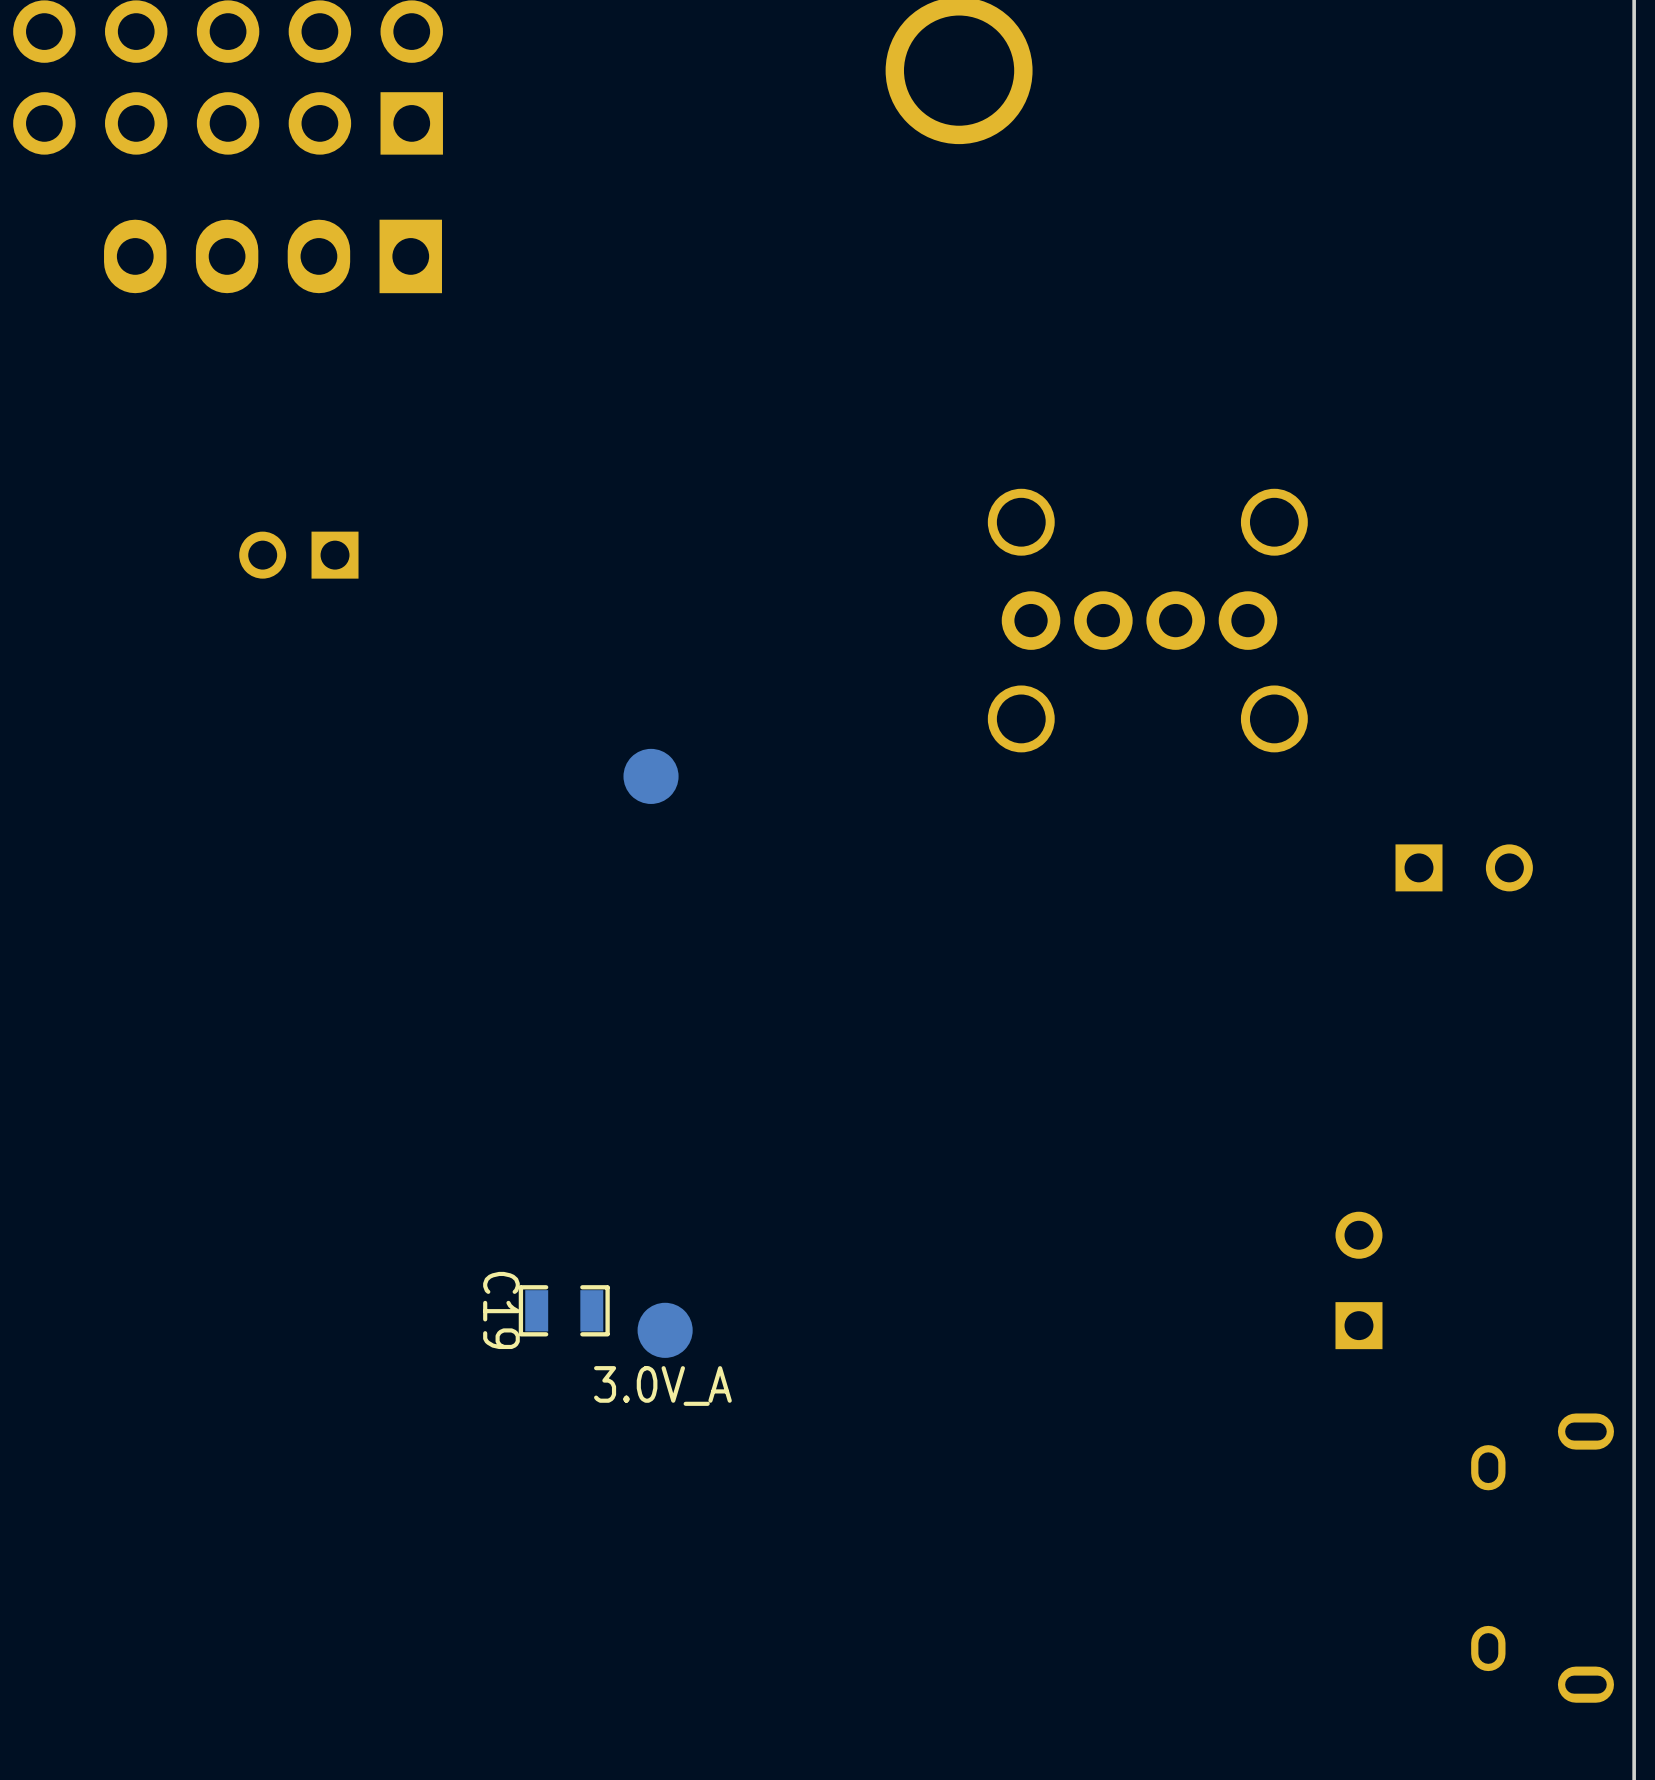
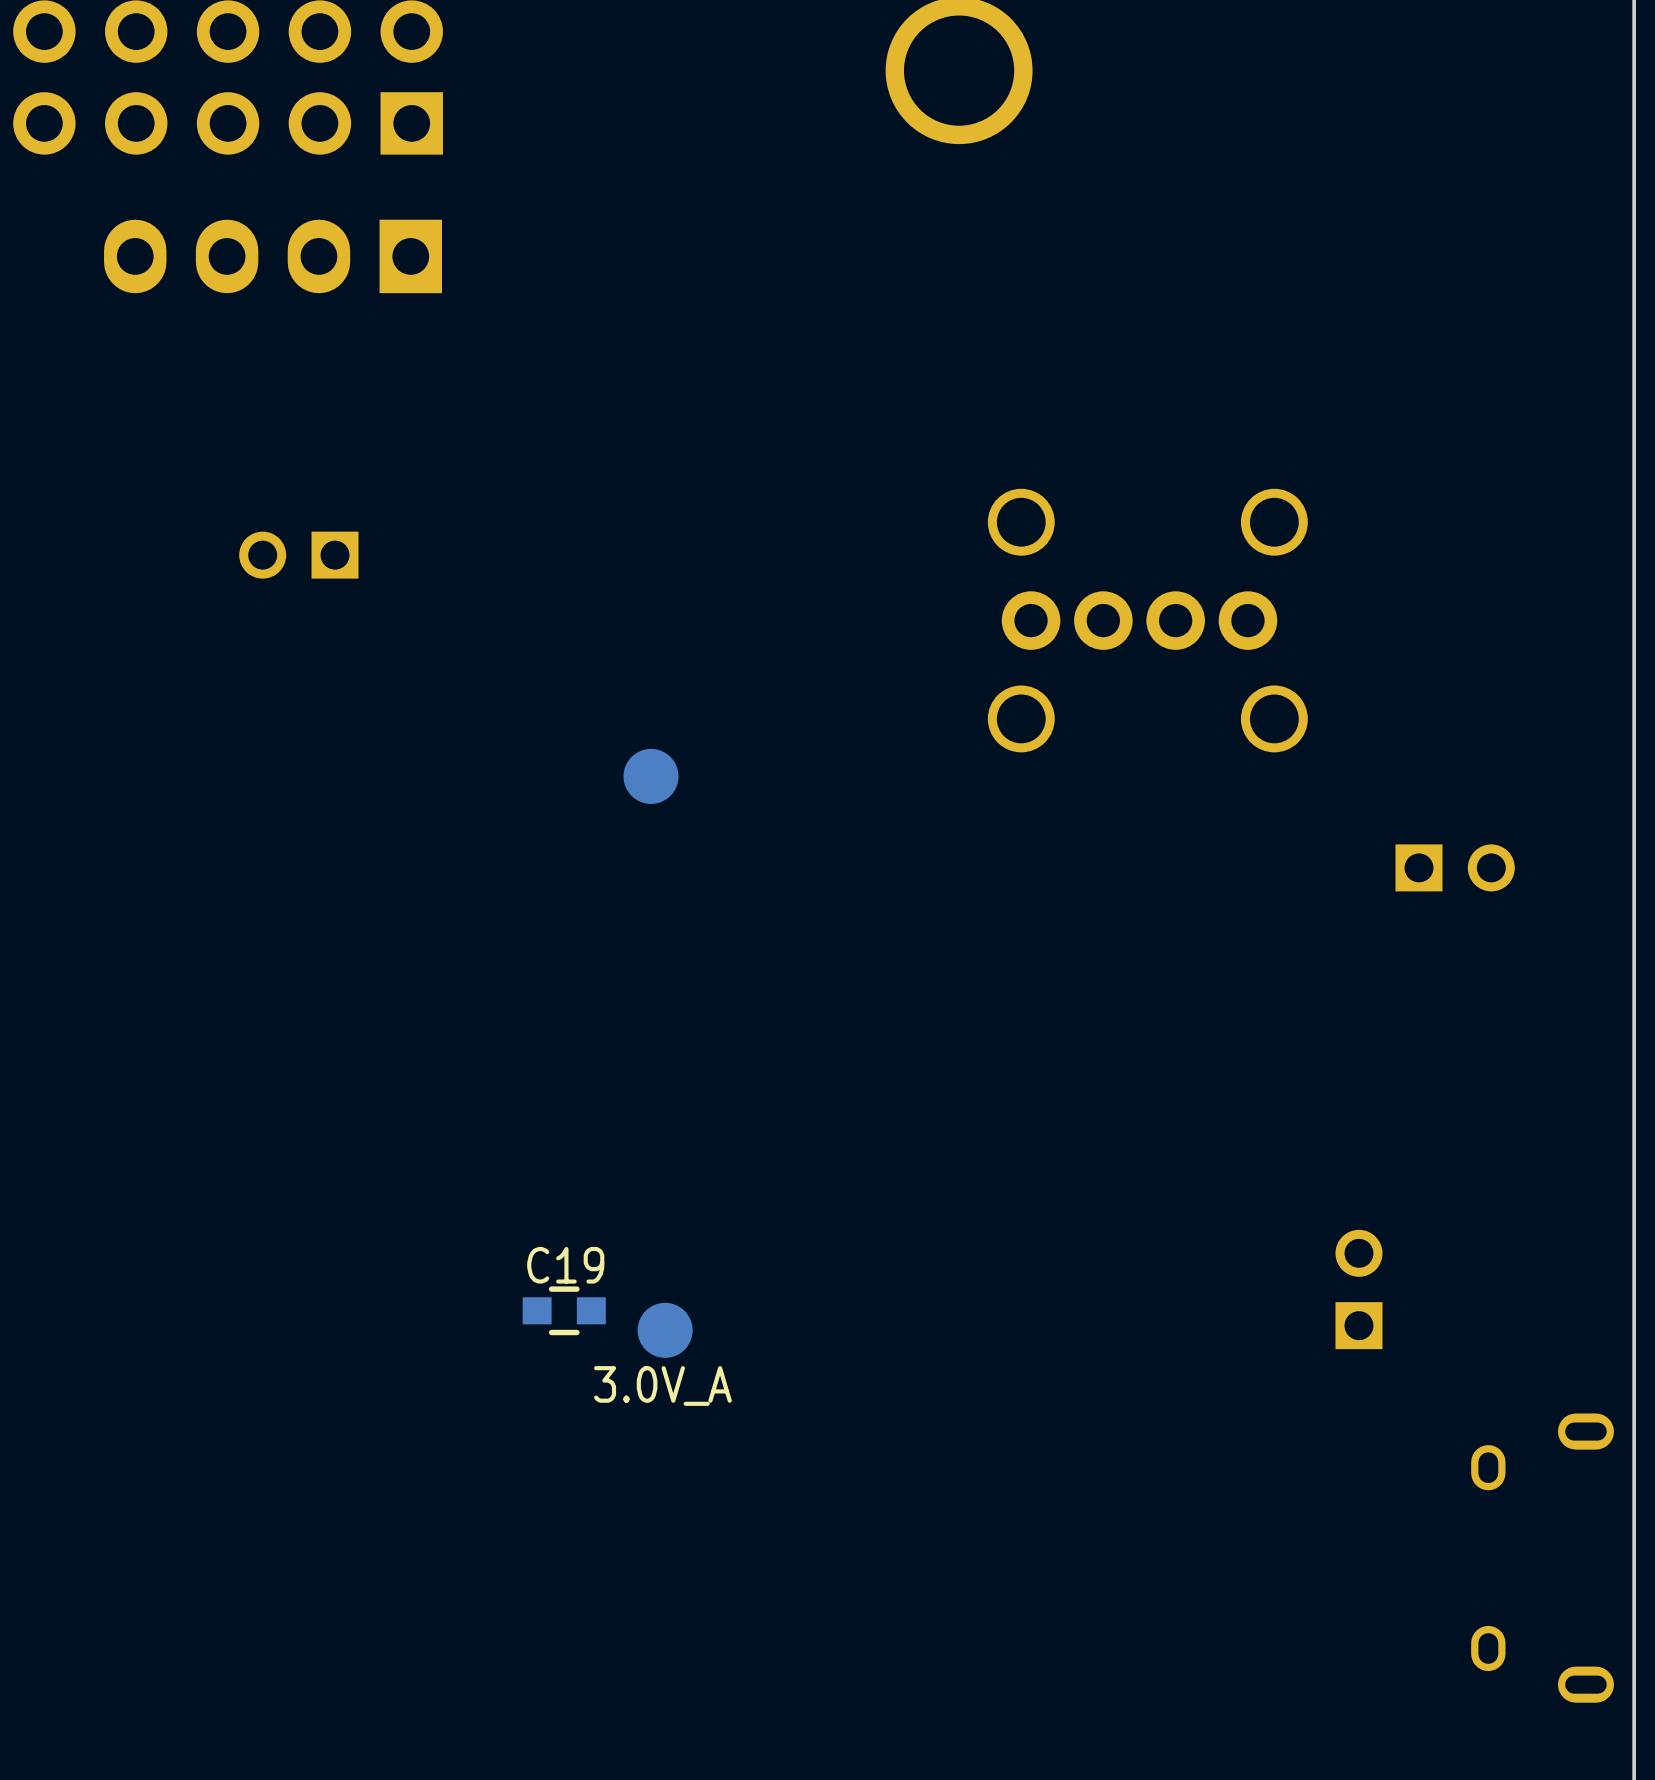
part footprint: [1395, 844, 1533, 892] -> [1395, 844, 1515, 892]
part footprint: [1335, 1211, 1383, 1350] -> [1335, 1229, 1383, 1350]
C19 footprint: [518, 1285, 610, 1337] -> [522, 1286, 606, 1336]
C19 name position: C19 (501, 1310) -> C19 (565, 1265)

